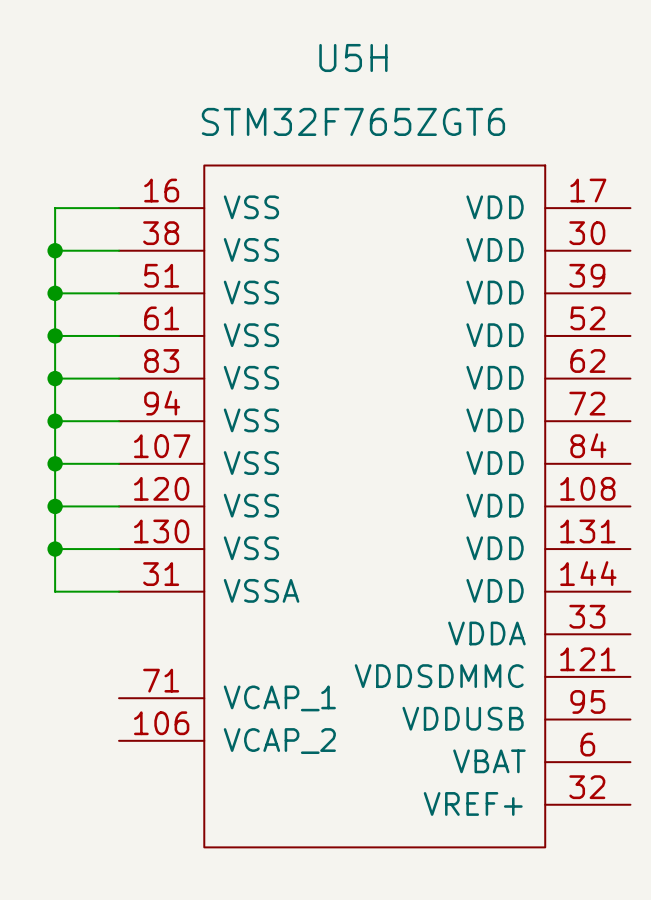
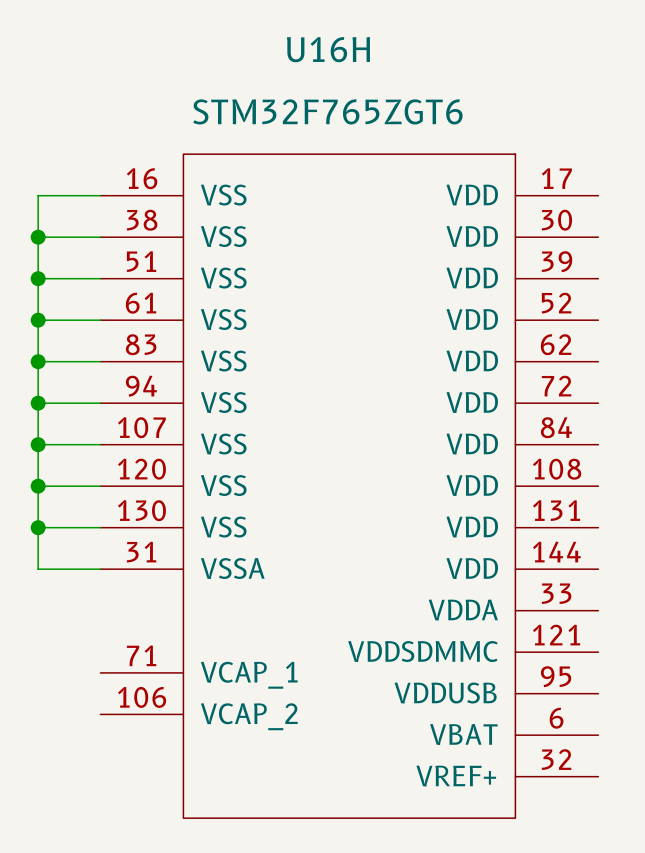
U5H name: U5H (353, 57) -> U16H (328, 49)

